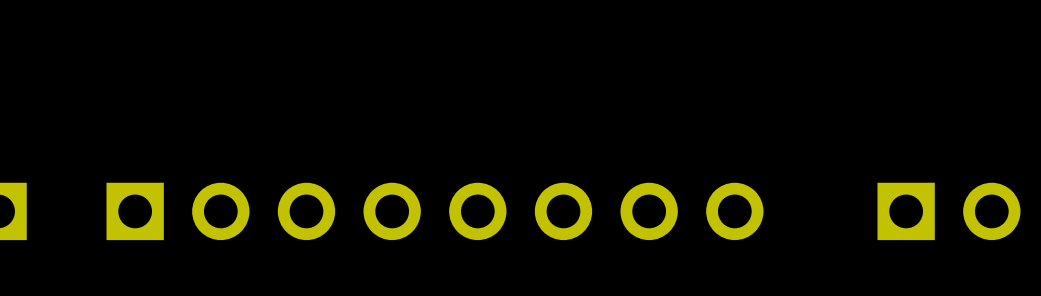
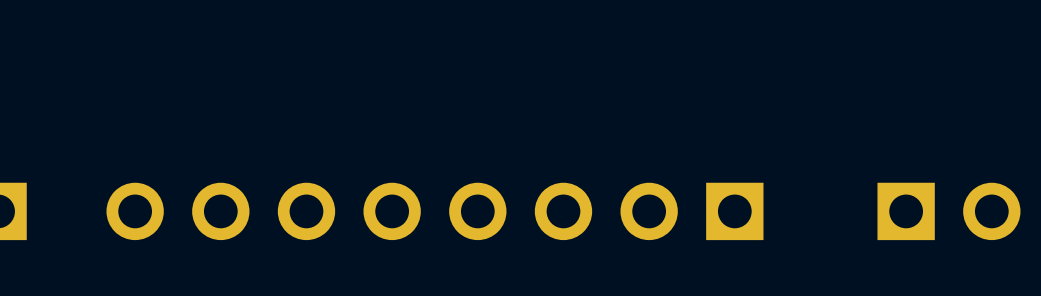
part rotation: 0° (434, 211) -> 180° (434, 211)

